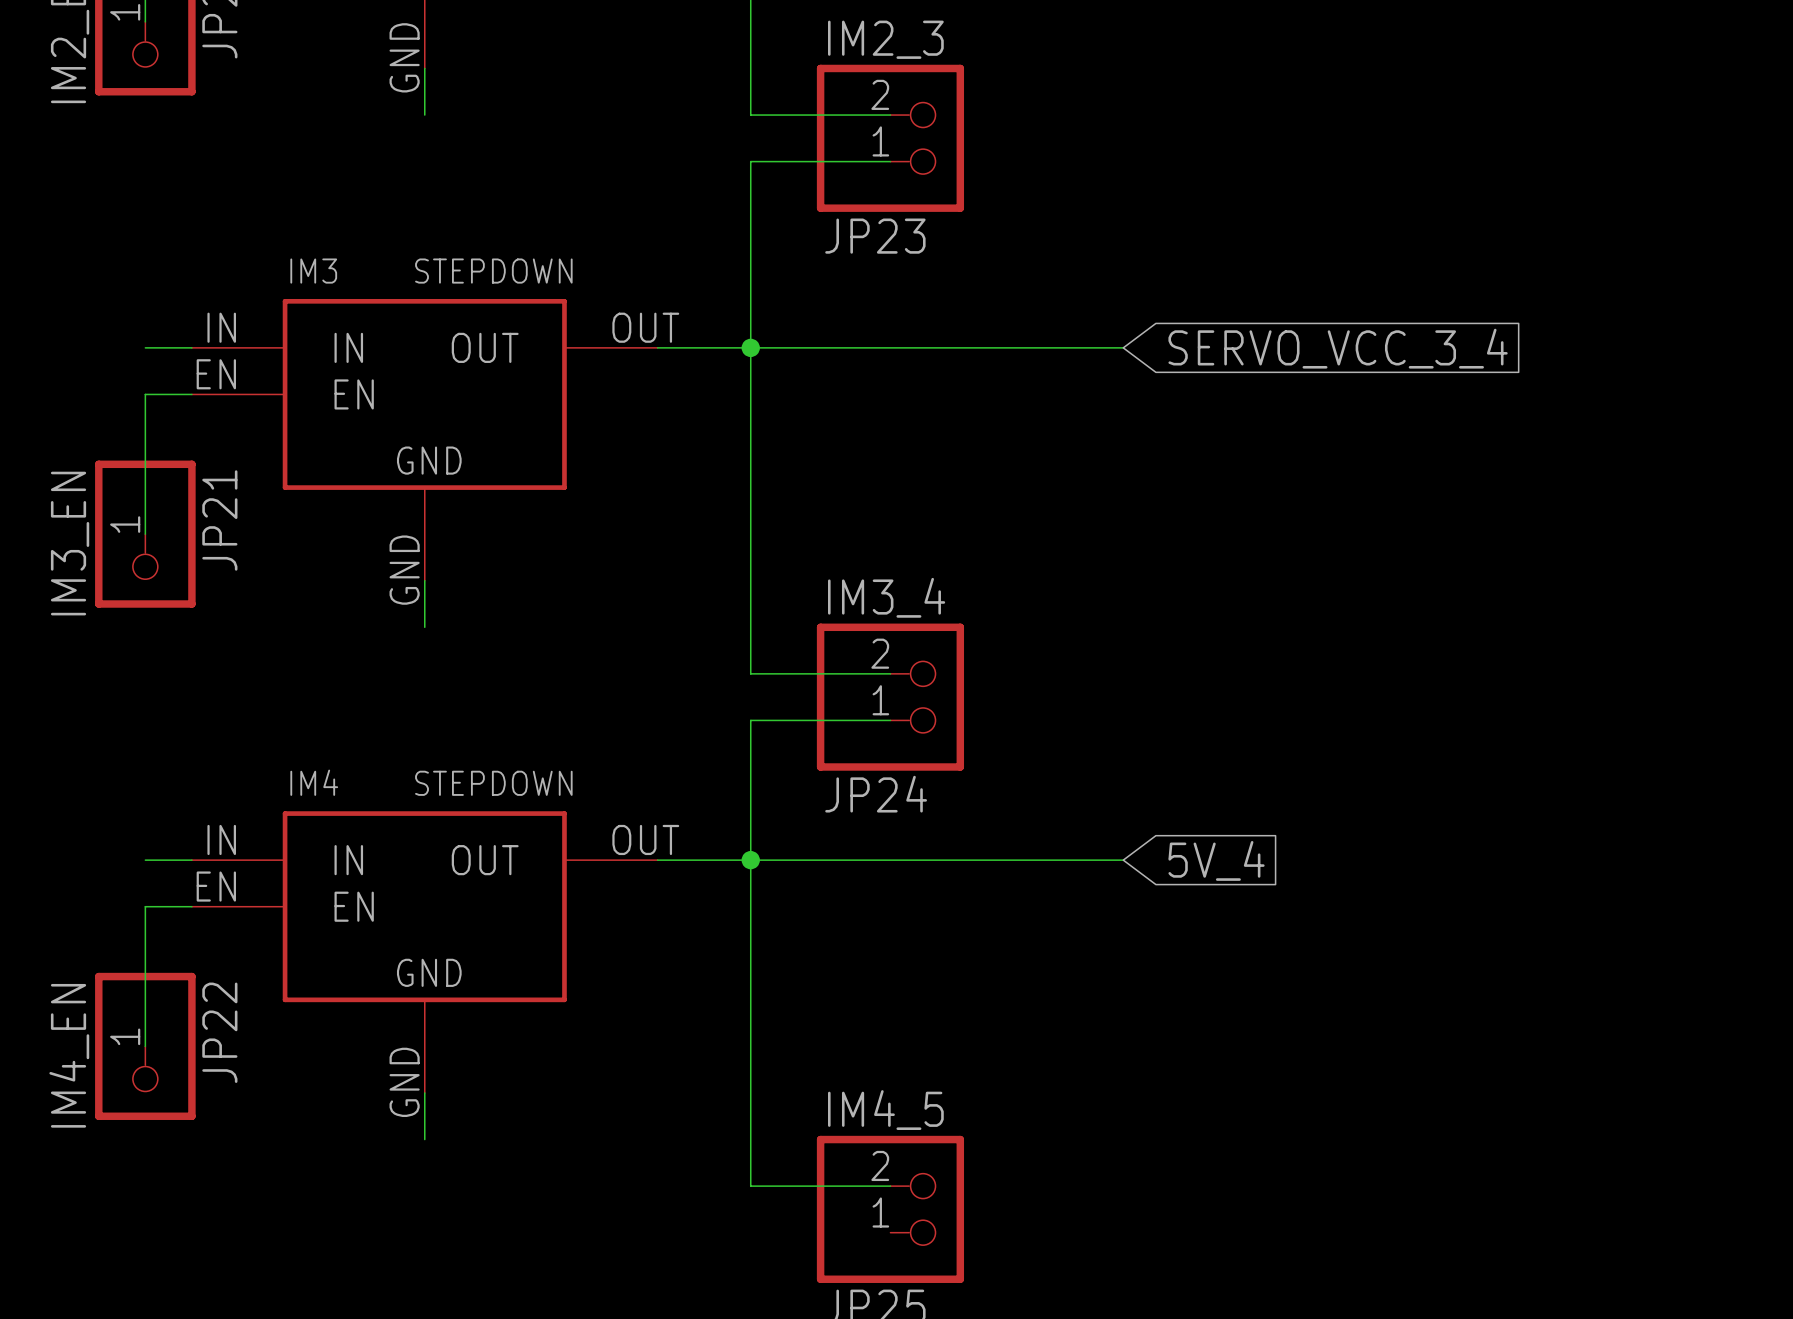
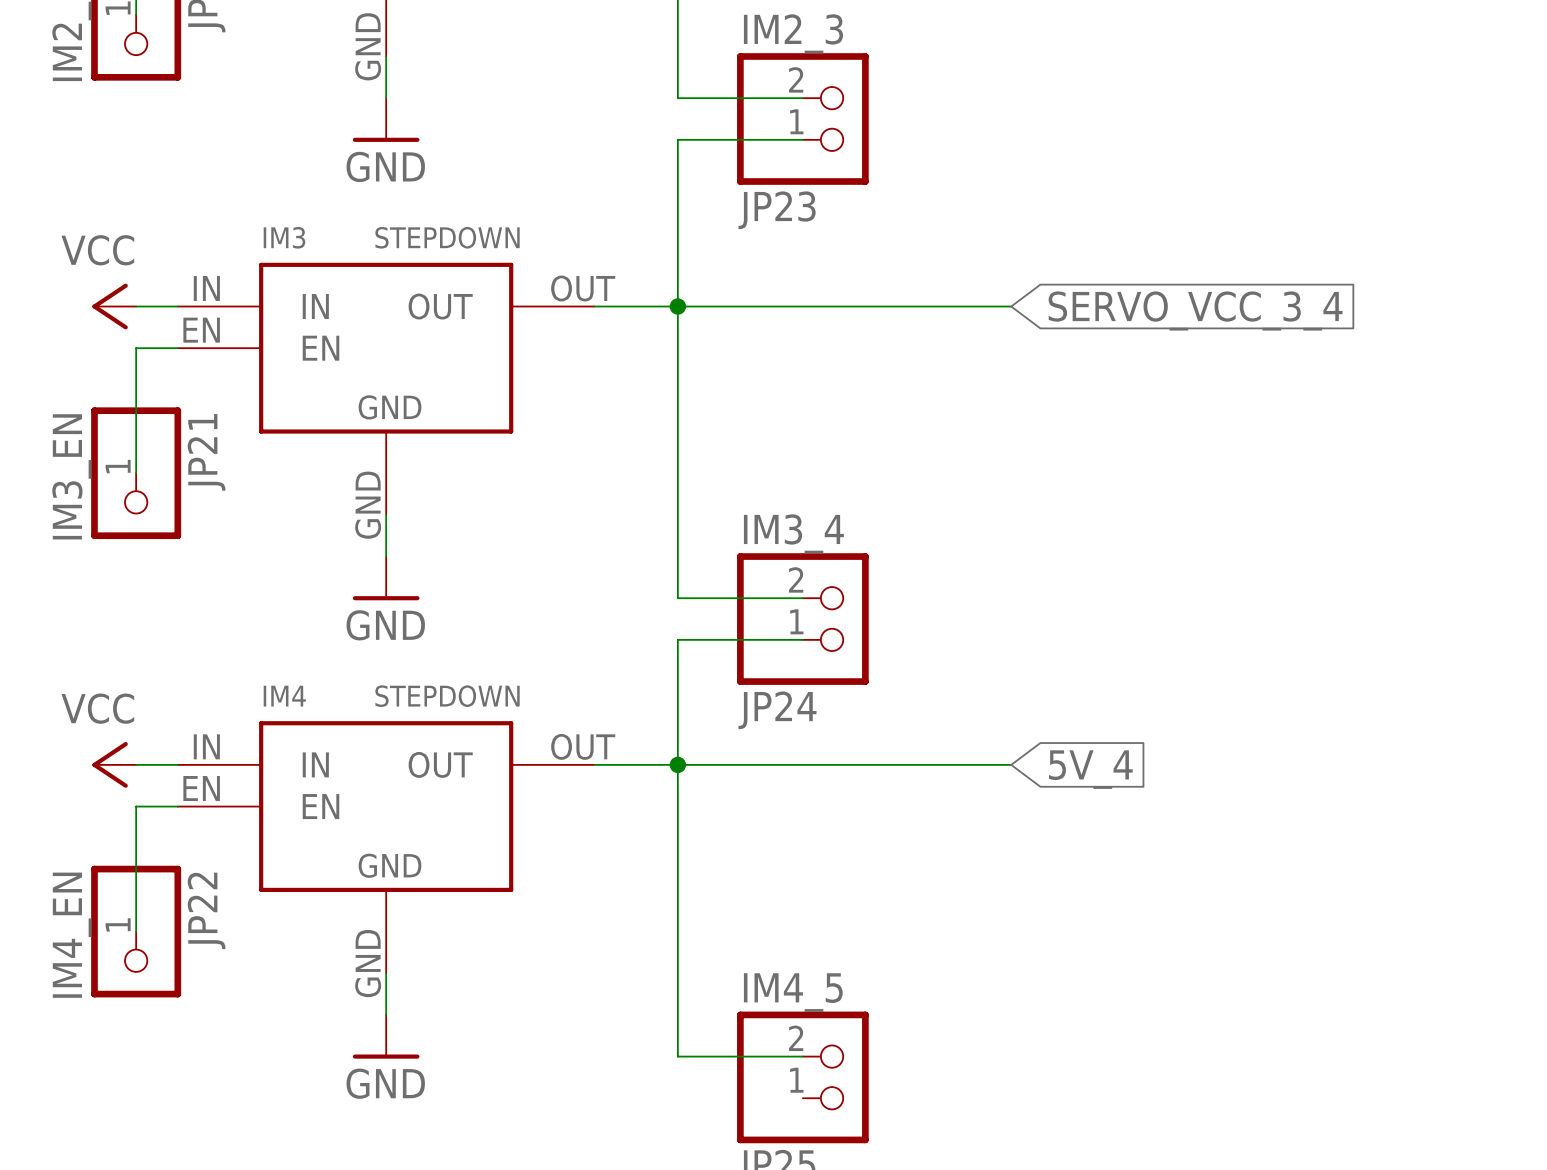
power symbol: none -> GND (386, 120)
power symbol: none -> VCC (114, 306)
power symbol: none -> GND (386, 578)
power symbol: none -> VCC (114, 764)
power symbol: none -> GND (386, 1036)

